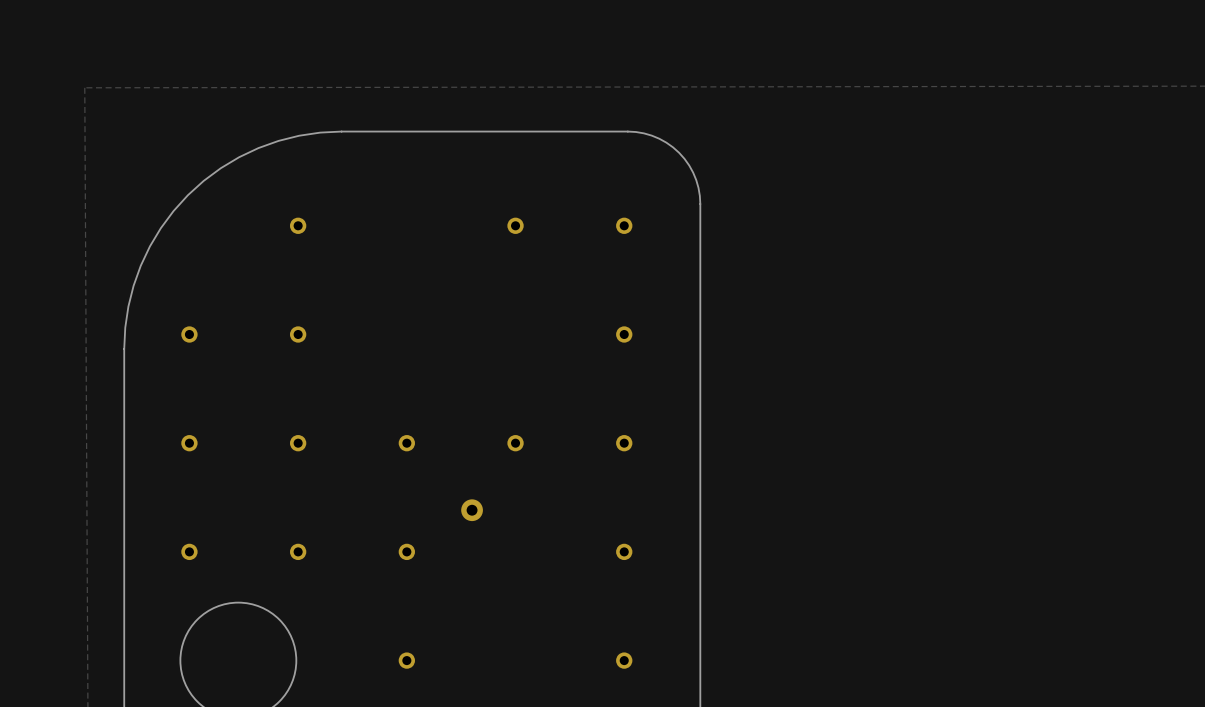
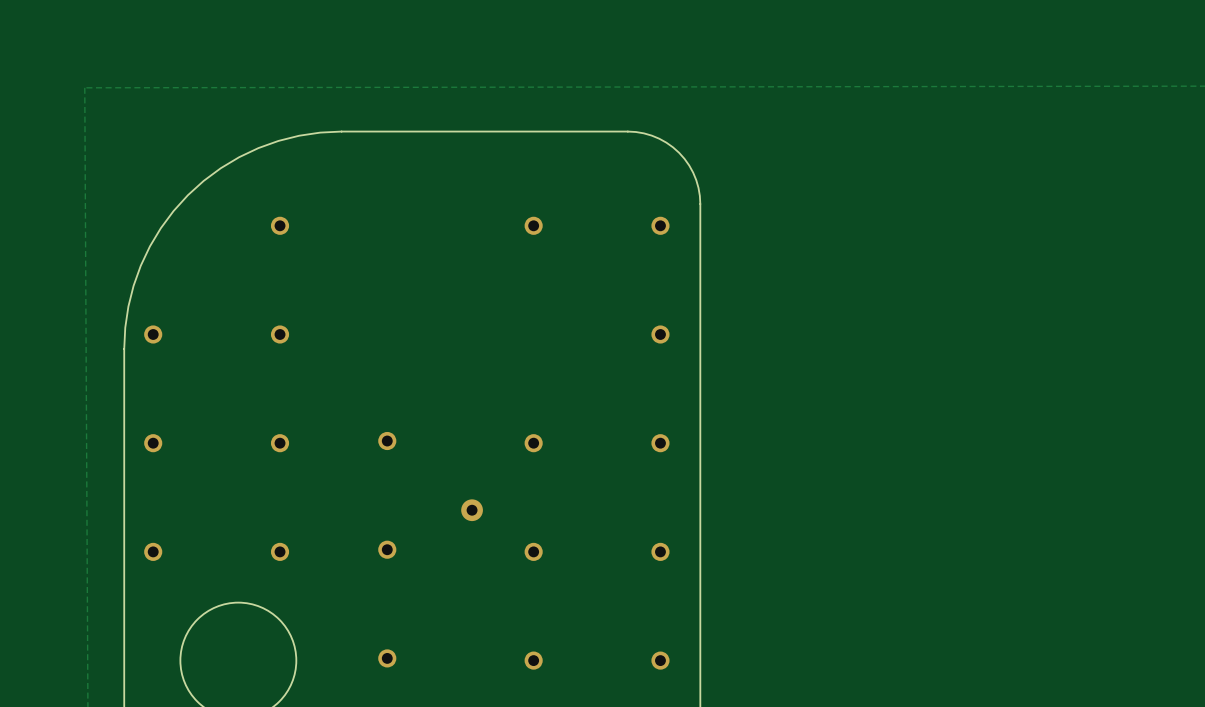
via: none -> (280, 225)
via: (298, 225) -> none
via: (515, 225) -> none
via: none -> (533, 225)
via: (624, 225) -> none
via: none -> (660, 225)
via: none -> (153, 334)
via: (189, 334) -> none
via: none -> (280, 334)
via: (298, 334) -> none
via: (624, 334) -> none
via: none -> (660, 334)
via: none -> (387, 441)
via: none -> (153, 443)
via: (189, 443) -> none
via: none -> (280, 443)
via: (298, 443) -> none
via: (406, 443) -> none
via: (515, 443) -> none
via: none -> (533, 443)
via: (624, 443) -> none
via: none -> (660, 443)
via: none -> (387, 549)
via: none -> (153, 551)
via: (189, 551) -> none
via: none -> (280, 551)
via: (298, 551) -> none
via: (406, 551) -> none
via: none -> (533, 551)
via: (624, 551) -> none
via: none -> (660, 551)
via: none -> (387, 658)
via: (406, 660) -> none
via: none -> (533, 660)
via: (624, 660) -> none
via: none -> (660, 660)

